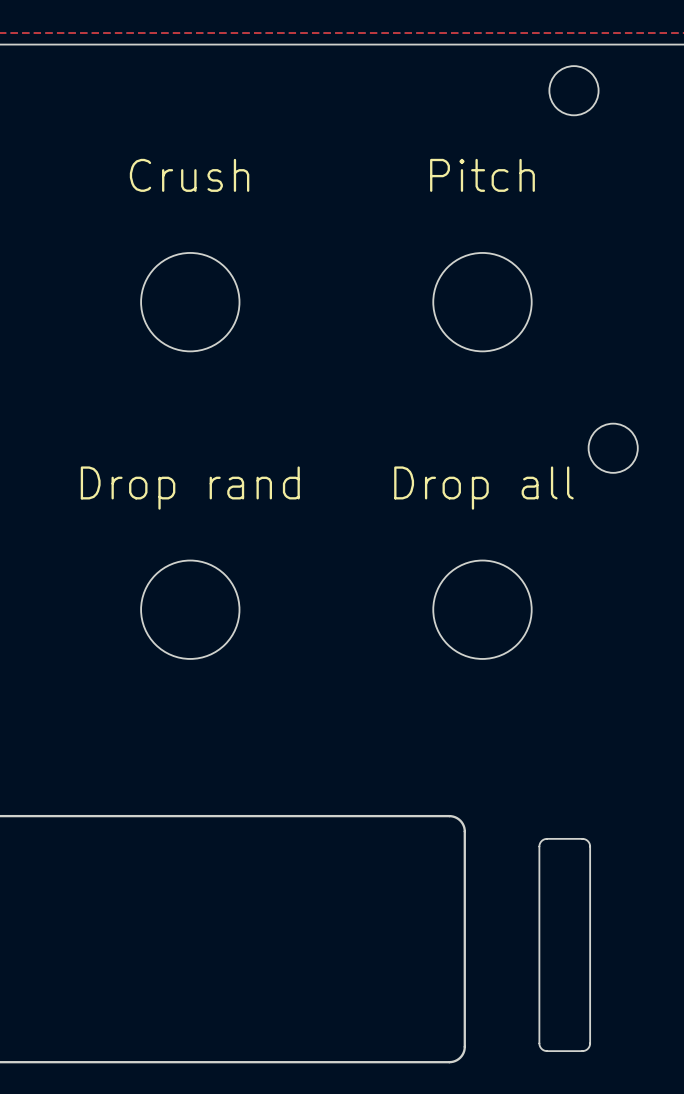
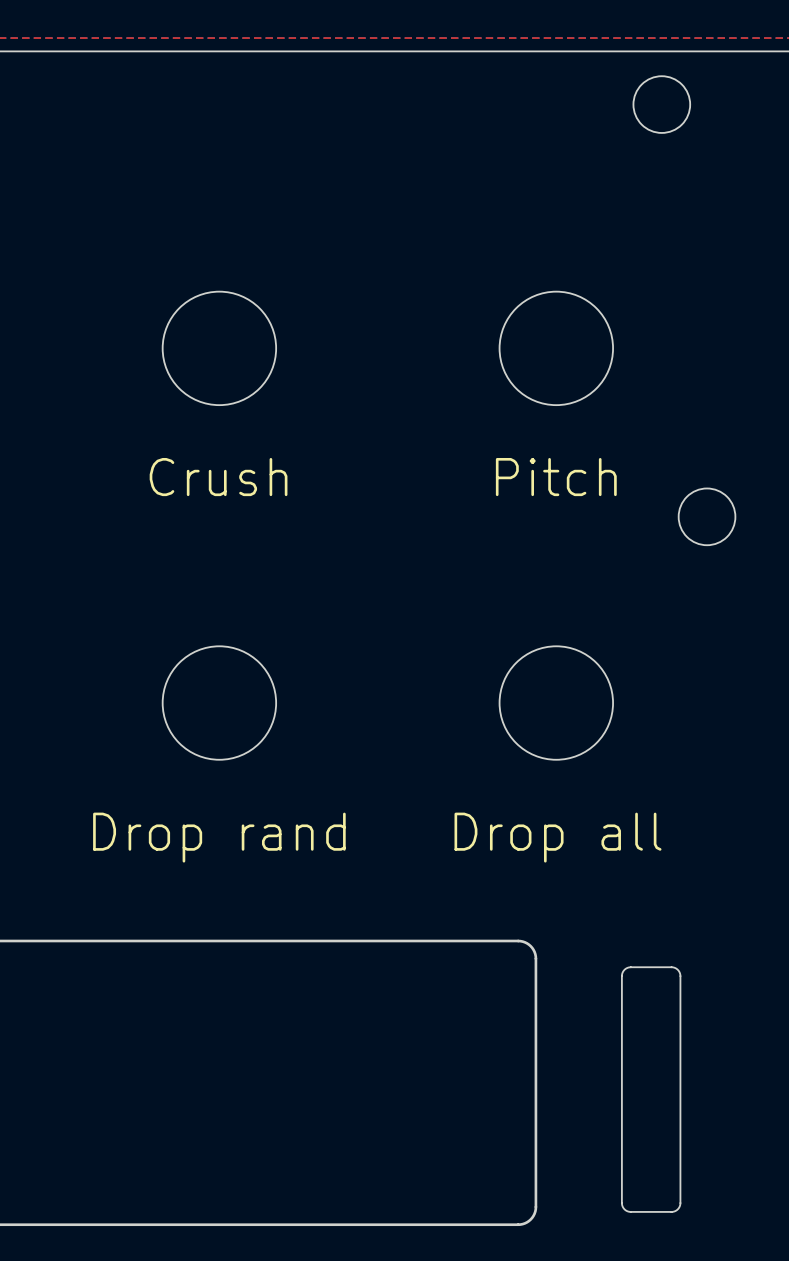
part value position: Crush (189, 175) -> Crush (218, 477)
part value position: Pitch (482, 175) -> Pitch (556, 477)
part value position: Drop rand (190, 488) -> Drop rand (219, 837)
part value position: Drop all (483, 488) -> Drop all (558, 837)

